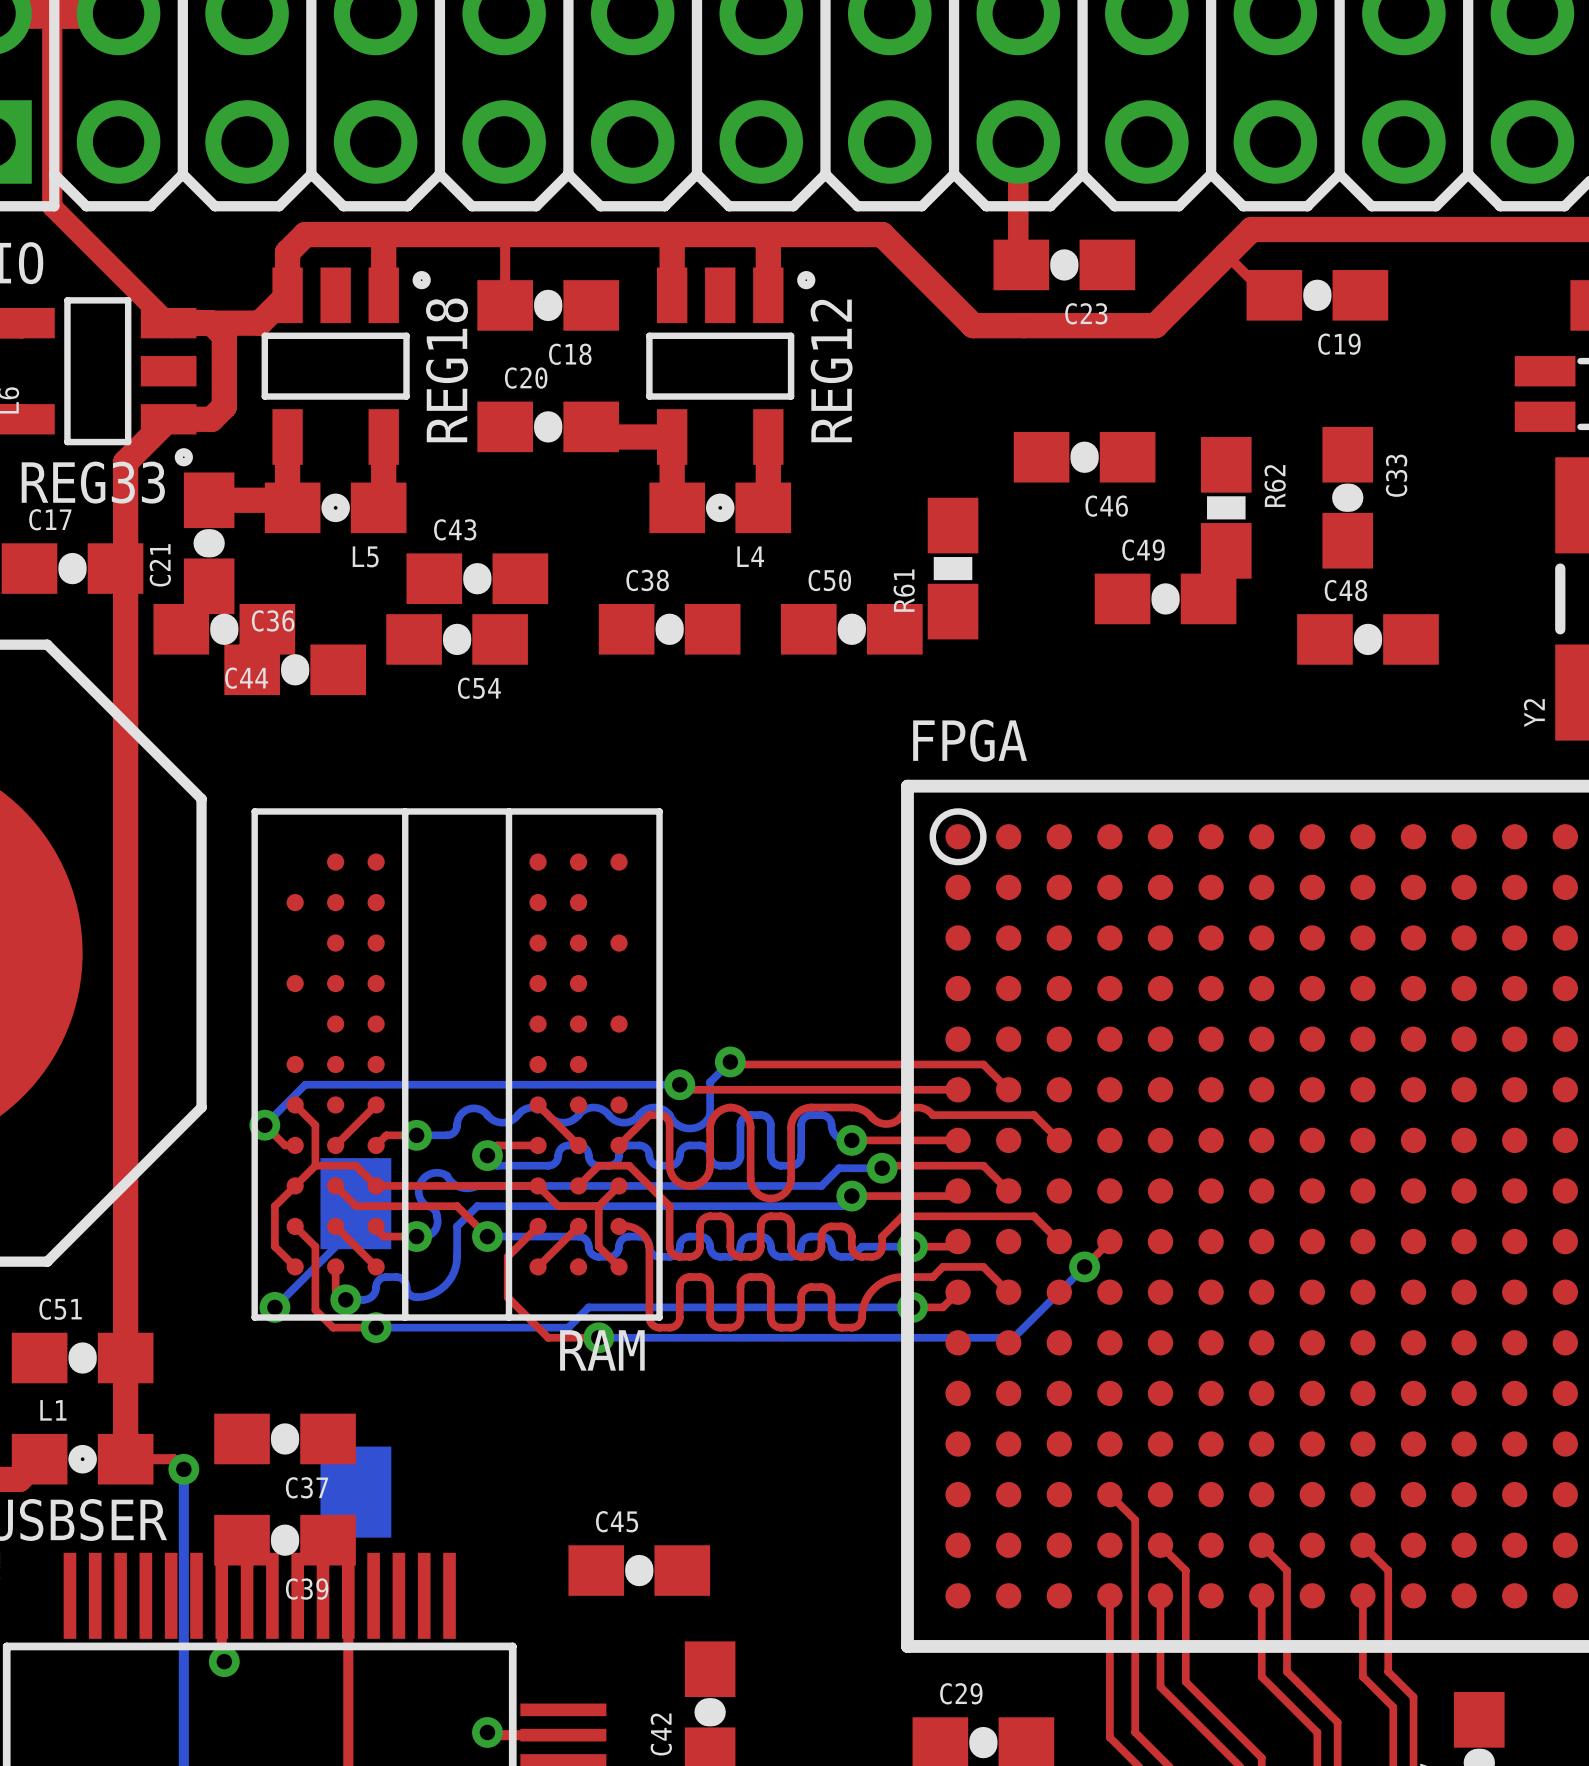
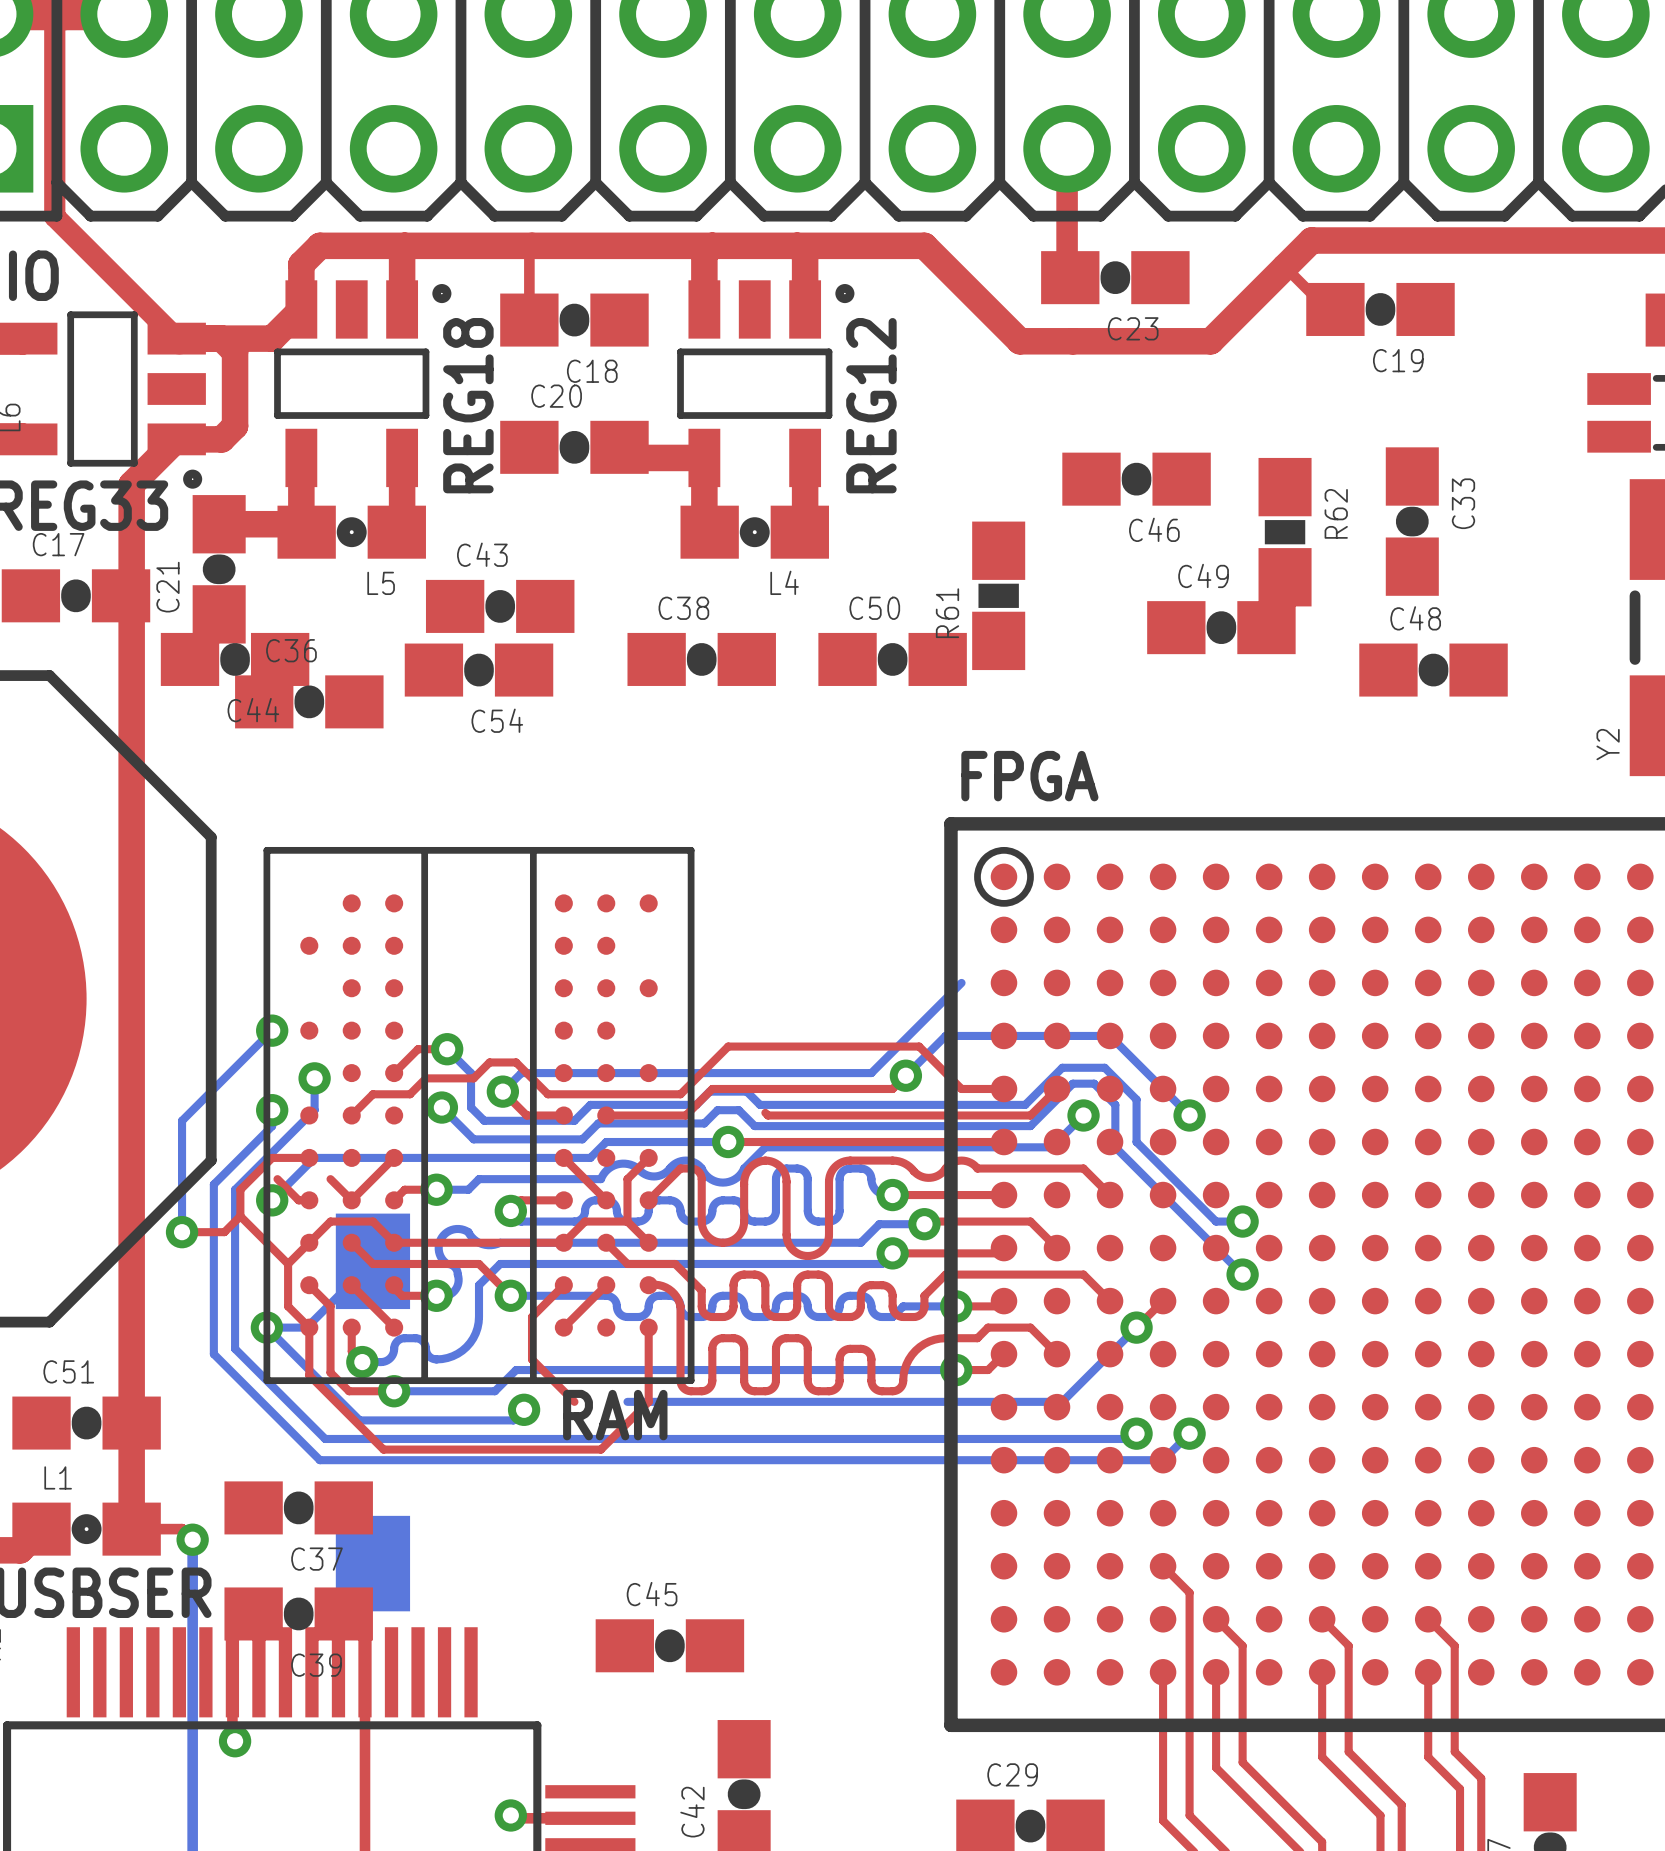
bottom track: none -> (961, 982) (871, 1073) (521, 1073) (502, 1091)
bottom track: none -> (272, 1030) (182, 1120) (182, 1232)
via: none -> (272, 1030)
top track: none -> (447, 1049) (418, 1049) (394, 1073)
bottom track: none -> (447, 1049) (471, 1073) (471, 1107) (484, 1120) (574, 1120) (590, 1104) (696, 1104) (709, 1091) (746, 1091) (760, 1104) (1025, 1104) (1062, 1067) (1104, 1067) (1136, 1099) (1136, 1142) (1216, 1221) (1242, 1221)
via: none -> (447, 1049)
top track: none -> (905, 1075) (892, 1088) (712, 1088) (685, 1115) (606, 1115)
bottom track: none -> (905, 1075) (945, 1035) (1110, 1035) (1189, 1115)
via: none -> (905, 1075)
bottom track: none -> (314, 1078) (314, 1110) (235, 1189) (235, 1348) (325, 1438) (1131, 1438) (1136, 1433)
via: none -> (314, 1078)
top track: none -> (1003, 1088) (961, 1088) (919, 1046) (728, 1046) (680, 1094) (547, 1094) (516, 1062) (489, 1062) (473, 1078) (425, 1078) (410, 1094) (372, 1094) (351, 1115)
top track: none -> (502, 1091) (526, 1115) (563, 1115)
via: none -> (502, 1091)
bottom track: none -> (441, 1107) (473, 1139) (582, 1139) (598, 1123) (704, 1123) (717, 1110) (738, 1110) (754, 1126) (1030, 1126) (1072, 1083) (1094, 1083) (1115, 1104) (1115, 1147) (1242, 1274)
via: none -> (441, 1107)
bottom track: none -> (272, 1110) (272, 1126) (213, 1184) (213, 1354) (319, 1460) (1163, 1460) (1189, 1433)
via: none -> (272, 1110)
bottom track: (730, 1061) (710, 1082) (710, 1115) -> (1083, 1115) (1051, 1147) (765, 1147) (744, 1168)
via: (730, 1061) -> none
top track: (983, 1064) (1008, 1089) -> (1030, 1115) (1057, 1088)
via: none -> (1083, 1115)
via: none -> (1189, 1115)
bottom track: (679, 1084) (305, 1084) (264, 1125) -> none
via position: (679, 1084) -> (728, 1142)
bottom track: none -> (728, 1142) (606, 1142) (590, 1157) (314, 1157) (272, 1200)
top track: (295, 1104) (315, 1125) (315, 1165) -> (309, 1157) (272, 1157) (240, 1189) (240, 1216)
top track: none -> (648, 1157) (627, 1179) (627, 1221)
bottom track: (608, 1115) (602, 1109) (591, 1107) (583, 1110) (571, 1120) (561, 1122) (552, 1119) (541, 1109) (530, 1107) (522, 1110) (511, 1120) (502, 1122) (492, 1119) (480, 1109) (472, 1108) (461, 1113) (455, 1131) (446, 1135) -> (638, 1168) (627, 1164) (616, 1164) (607, 1169) (600, 1179) (479, 1179) (468, 1189)
via position: (264, 1125) -> (272, 1200)
top track: none -> (330, 1179) (351, 1200)
top track: none -> (240, 1216) (288, 1263)
top track: none -> (240, 1216) (224, 1232) (182, 1232)
via: none -> (1242, 1221)
via: none -> (182, 1232)
top track: (538, 1185) (558, 1206) (598, 1206) -> (563, 1242) (585, 1221) (627, 1221)
top track: (578, 1185) (598, 1165) (629, 1165) (669, 1206) (669, 1231) -> (606, 1242) (627, 1263) (675, 1263) (701, 1290)
top track: (619, 1185) (598, 1206) -> (648, 1242) (627, 1221)
bottom track: (355, 1203) (355, 1226) (274, 1307) -> (372, 1261) (306, 1327) (266, 1327) (359, 1420) (513, 1420) (524, 1409)
top track: (598, 1206) (598, 1246) (619, 1266) -> (309, 1327) (309, 1375) (383, 1449) (600, 1449) (648, 1401) (648, 1327)
via: none -> (1242, 1274)
via position: (274, 1307) -> (266, 1327)
bottom track: (588, 1307) (568, 1327) (472, 1327) -> (616, 1370) (516, 1370) (494, 1391)
top track: (548, 1337) (598, 1337) -> none
via position: (598, 1337) -> (524, 1409)
via: none -> (1136, 1433)
via: none -> (1189, 1433)

